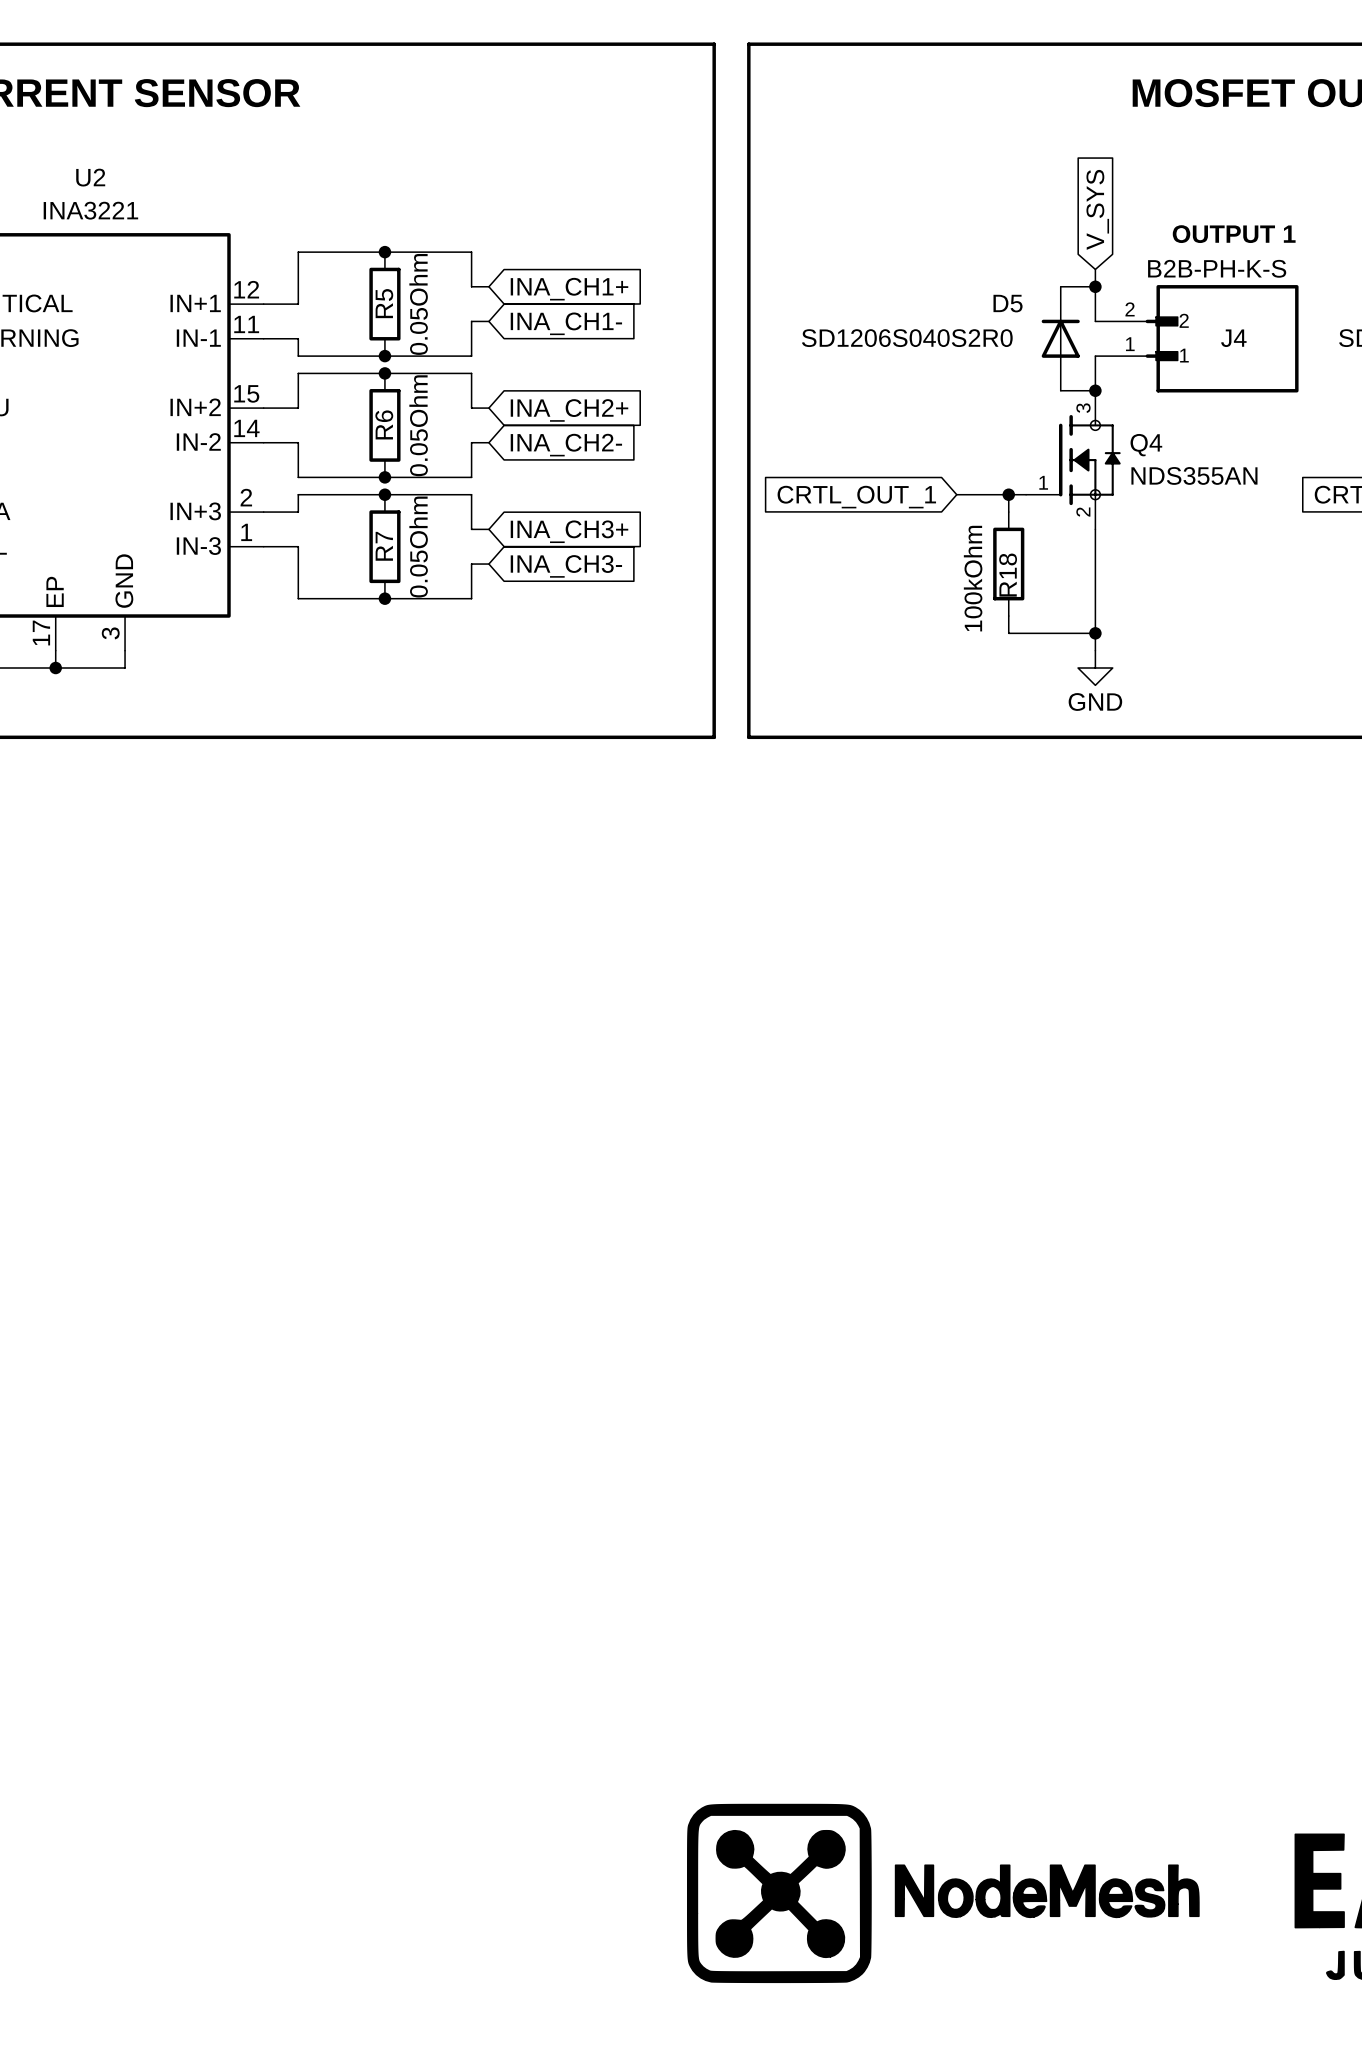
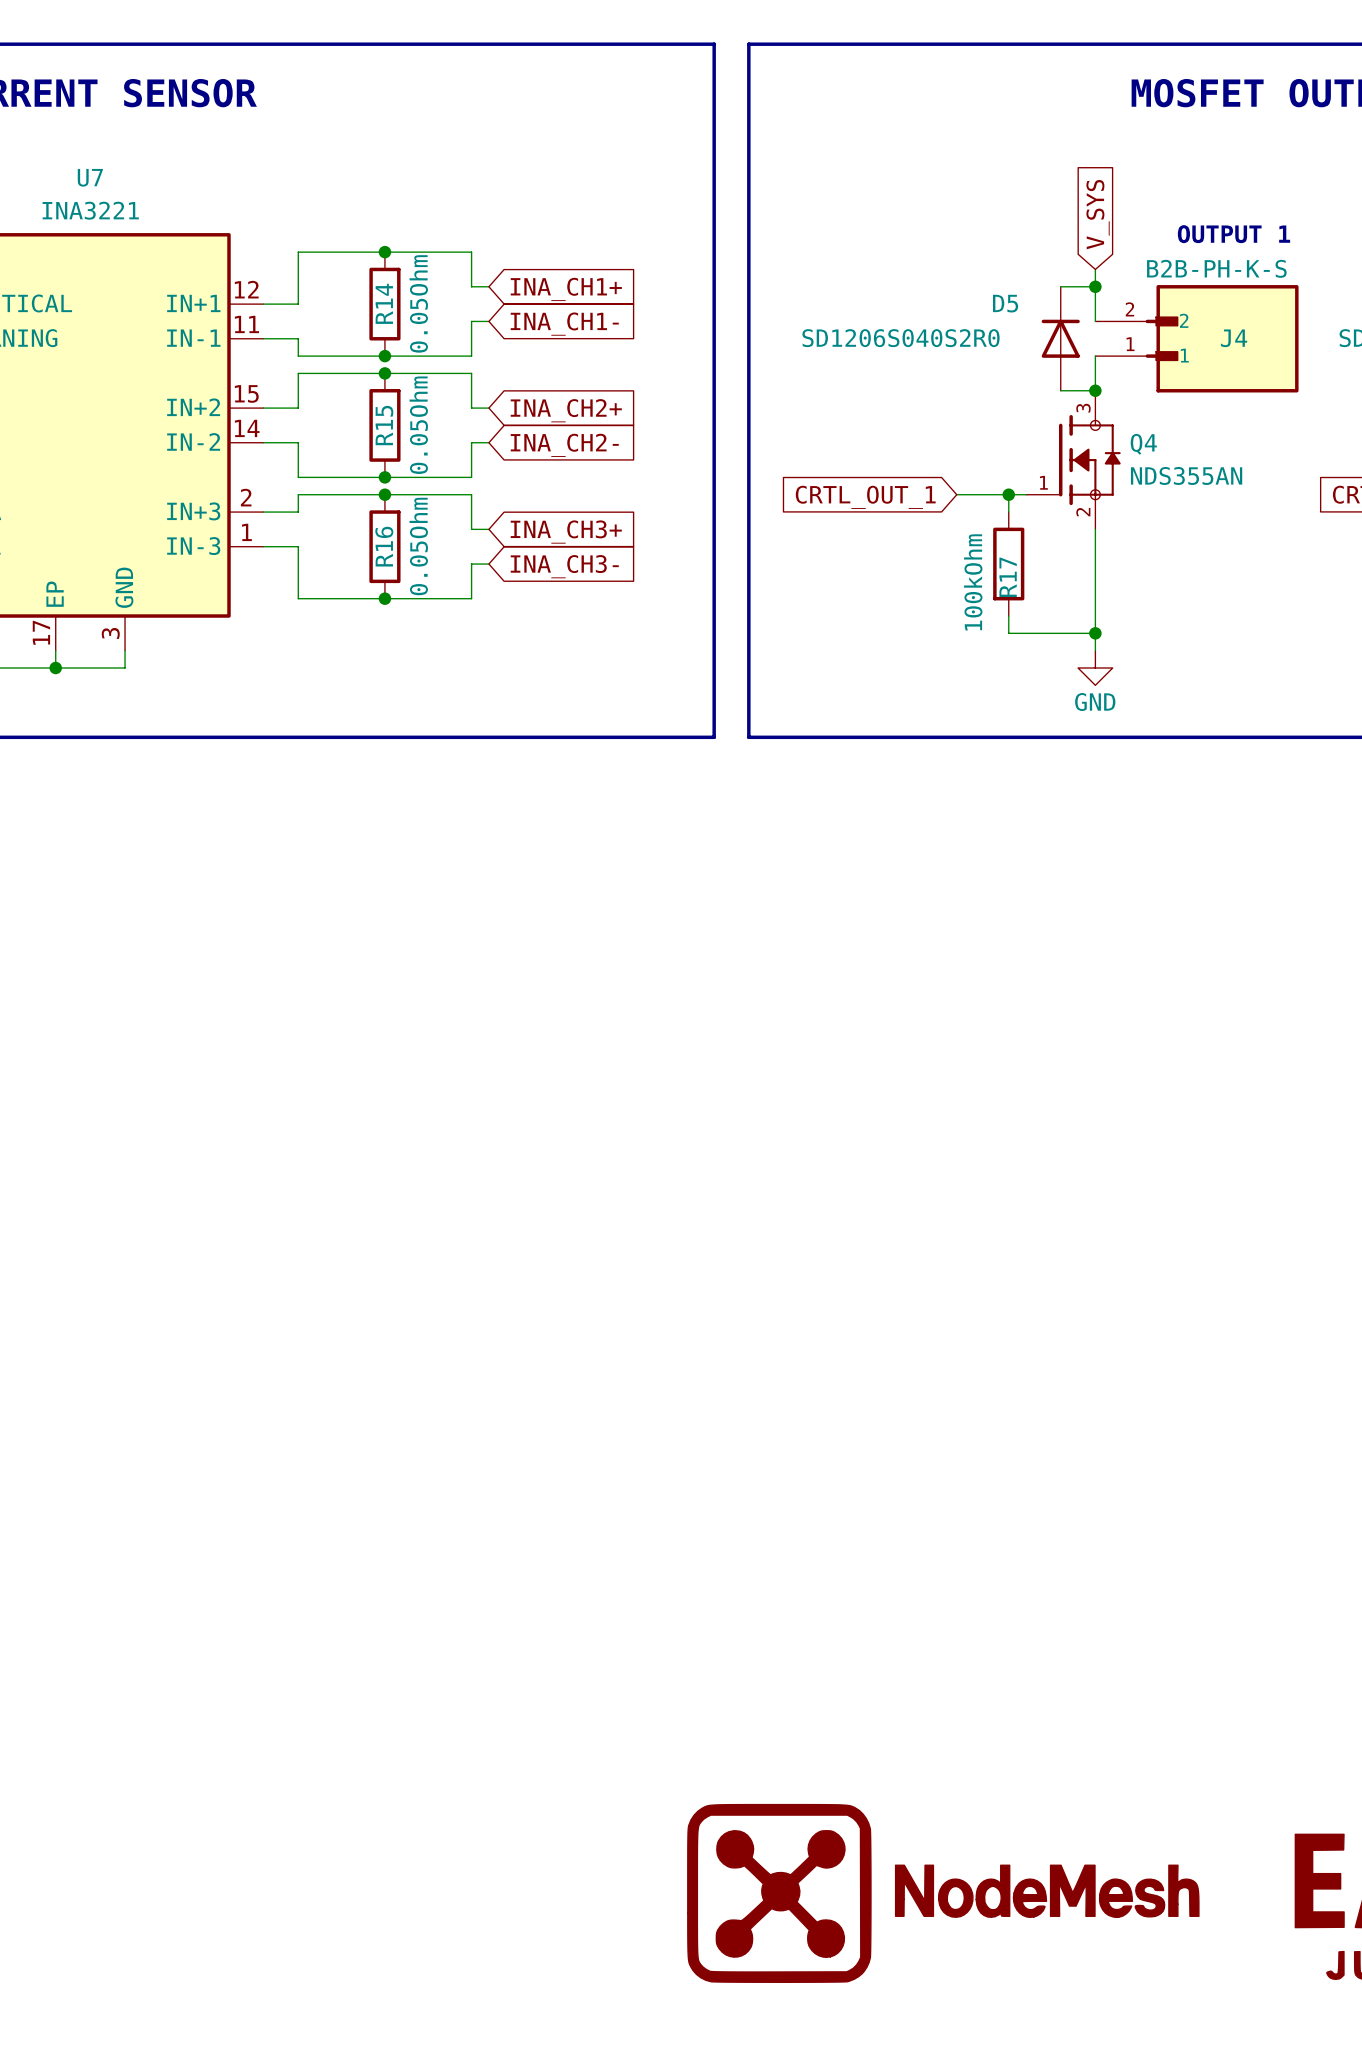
U2 name: U2 (90, 177) -> U7 (90, 177)
R5 name: R5 (384, 303) -> R14 (384, 303)
R6 name: R6 (384, 424) -> R15 (384, 425)
R7 name: R7 (384, 546) -> R16 (384, 546)
R18 name: R18 (1008, 575) -> R17 (1008, 577)

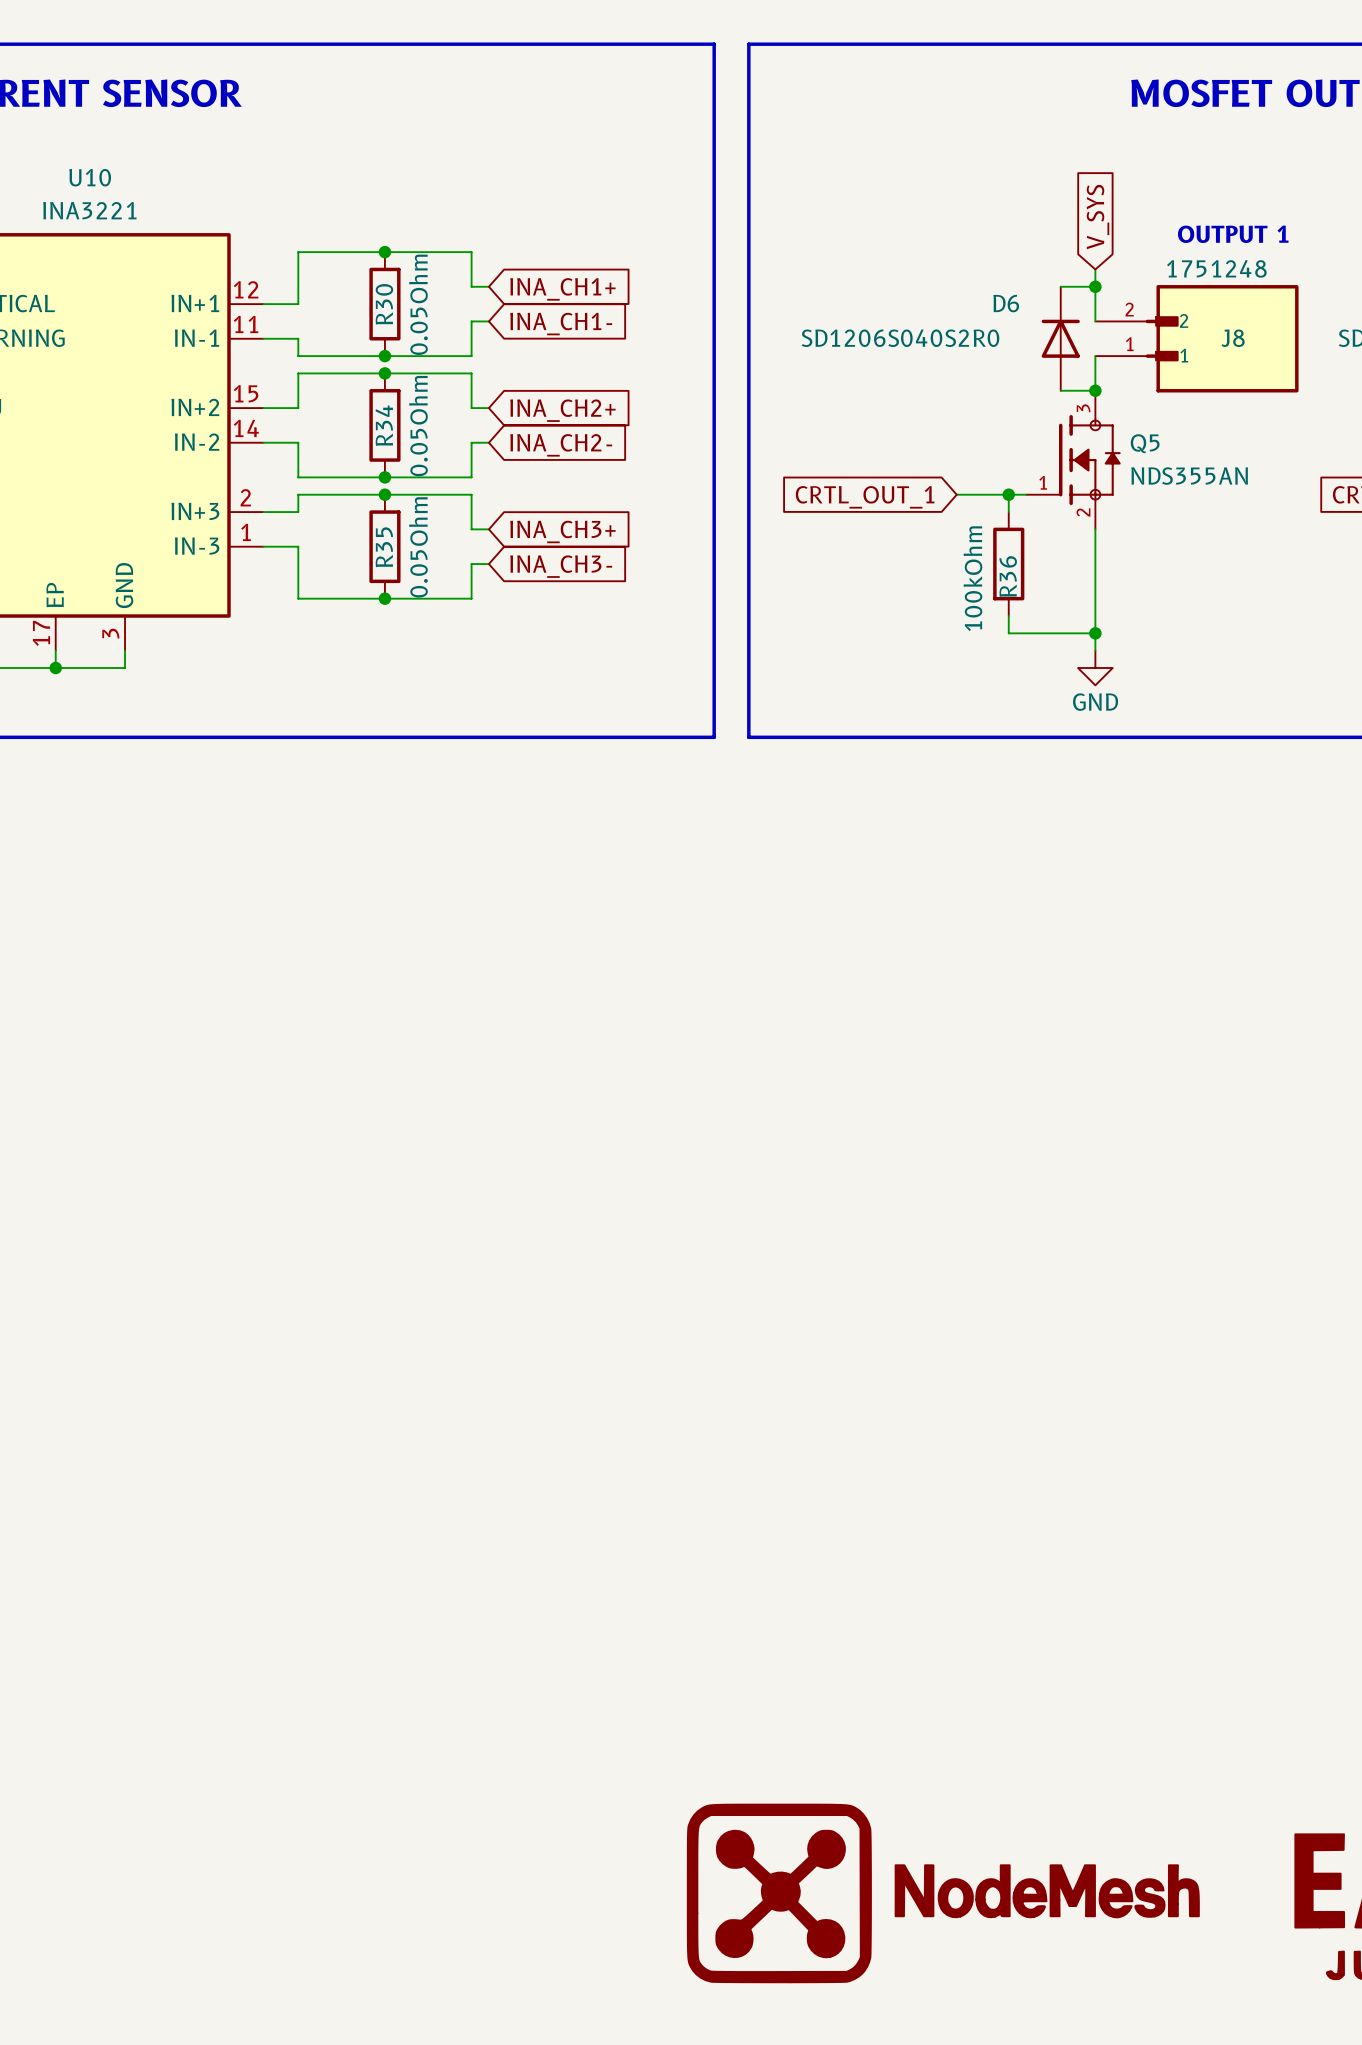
U7 name: U7 (90, 177) -> U10 (90, 177)
J4 value: B2B-PH-K-S (1216, 268) -> 1751248 (1216, 268)
R14 name: R14 (384, 303) -> R30 (384, 304)
D5 name: D5 (1005, 303) -> D6 (1006, 303)
J4 name: J4 (1234, 338) -> J8 (1233, 338)
R15 name: R15 (384, 425) -> R34 (384, 425)
Q4 name: Q4 (1143, 444) -> Q5 (1145, 443)
R16 name: R16 (384, 546) -> R35 (384, 547)
R17 name: R17 (1008, 577) -> R36 (1008, 576)

